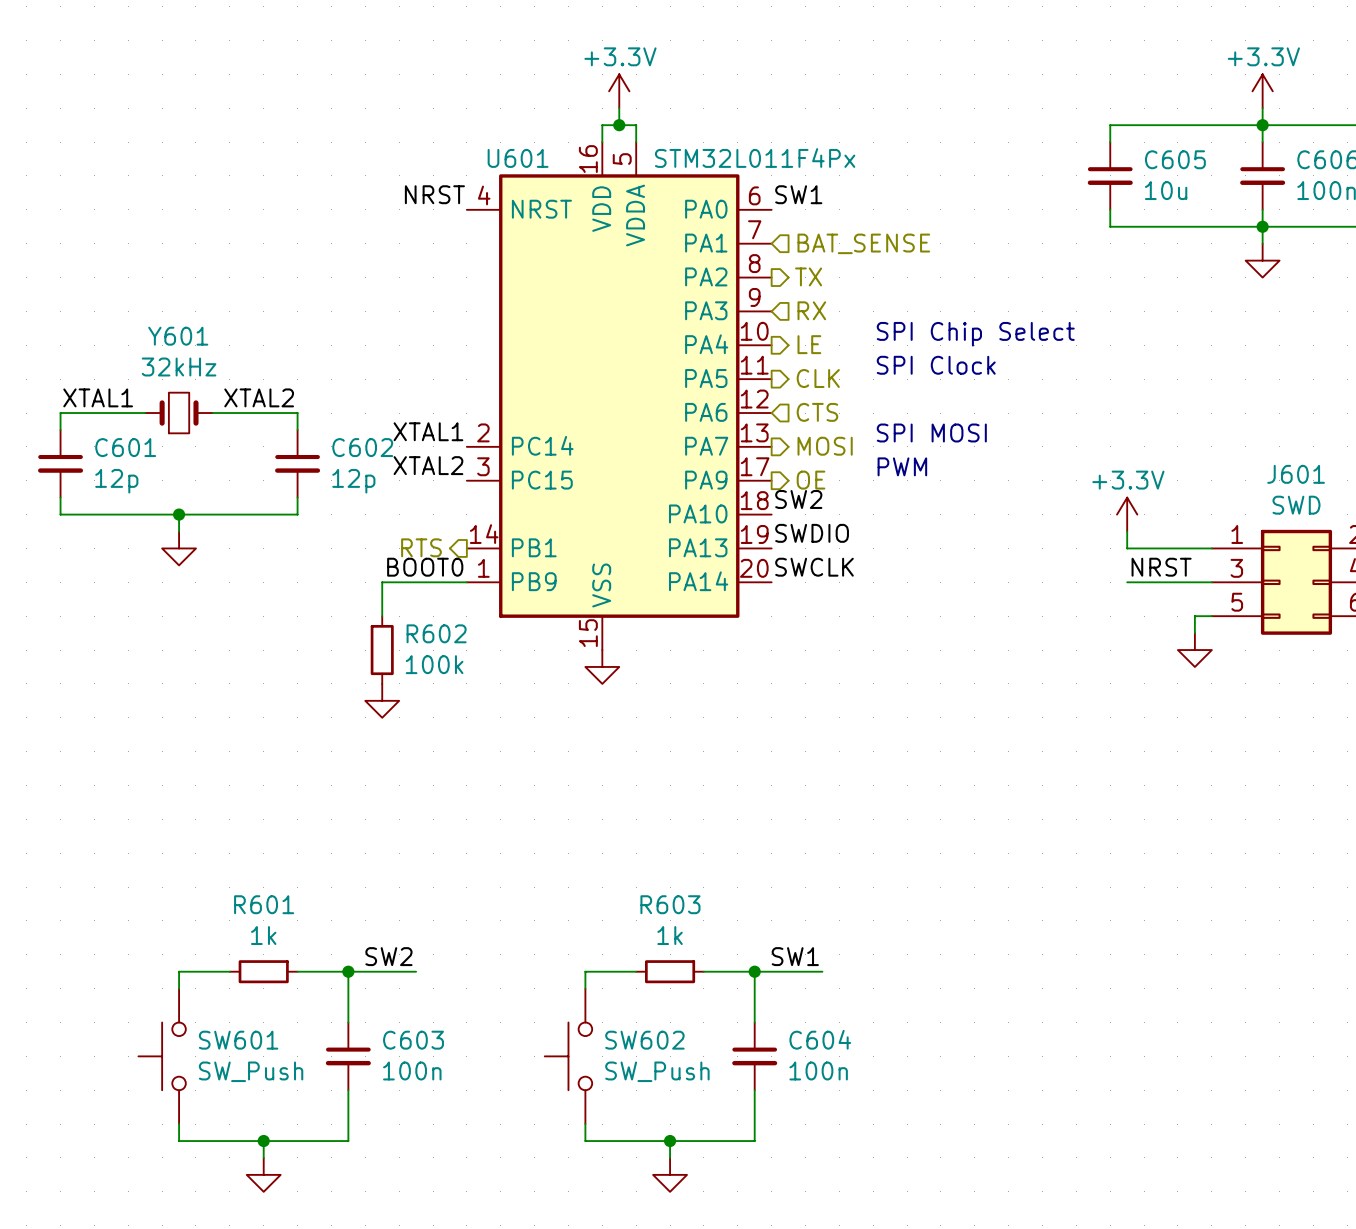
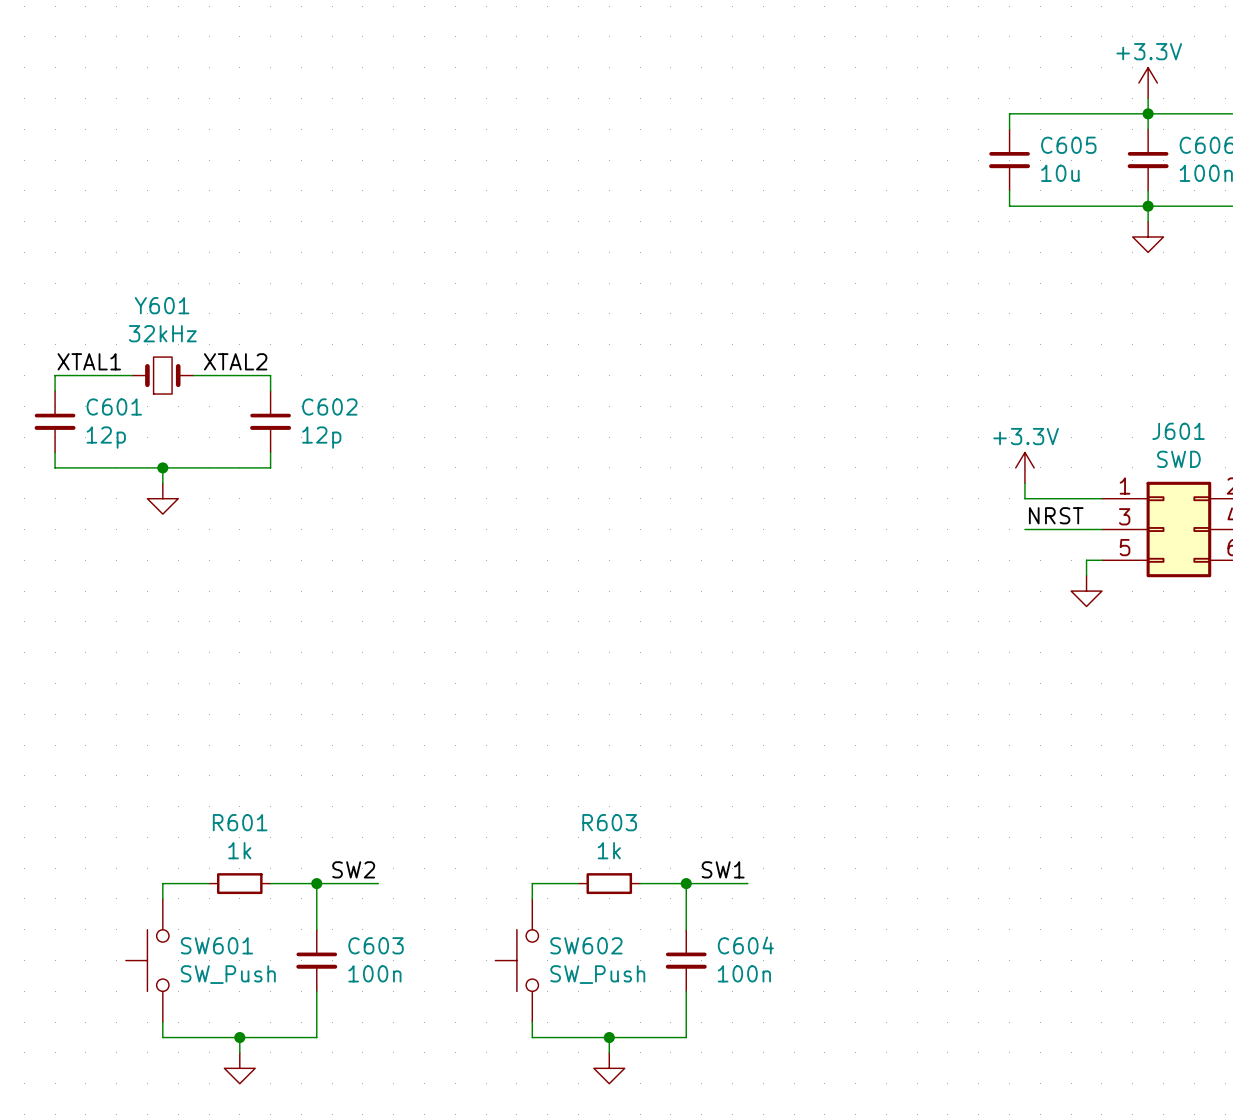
power symbol: +3.3V (619, 91) -> none
wire: (619, 108) (619, 125) -> none
junction: (619, 125) -> none
wire: (602, 142) (602, 125) (636, 125) (636, 142) -> none
label: NRST (434, 194) -> none
label: SW1 (798, 194) -> none
hierarchical label: BAT_SENSE (863, 243) -> none
hierarchical label: TX (808, 276) -> none
hierarchical label: RX (811, 310) -> none
text: SPI Chip Select (975, 334) -> none
hierarchical label: LE (809, 344) -> none
text: SPI Clock (936, 365) -> none
hierarchical label: CLK (818, 378) -> none
U601: STM32L011F4Px (619, 396) -> none
hierarchical label: CTS (817, 412) -> none
label: XTAL1 (428, 431) -> none
text: SPI MOSI (931, 432) -> none
hierarchical label: MOSI (825, 446) -> none
label: XTAL2 (428, 465) -> none
text: PWM (902, 466) -> none
hierarchical label: OE (811, 480) -> none
label: SW2 (798, 499) -> none
label: SWDIO (812, 533) -> none
hierarchical label: RTS (421, 547) -> none
label: BOOT0 (425, 567) -> none
label: SWCLK (814, 567) -> none
wire: (466, 582) (382, 582) (382, 616) -> none
R602: 100k (382, 650) -> none
power symbol: (602, 666) -> none
power symbol: (382, 700) -> none

